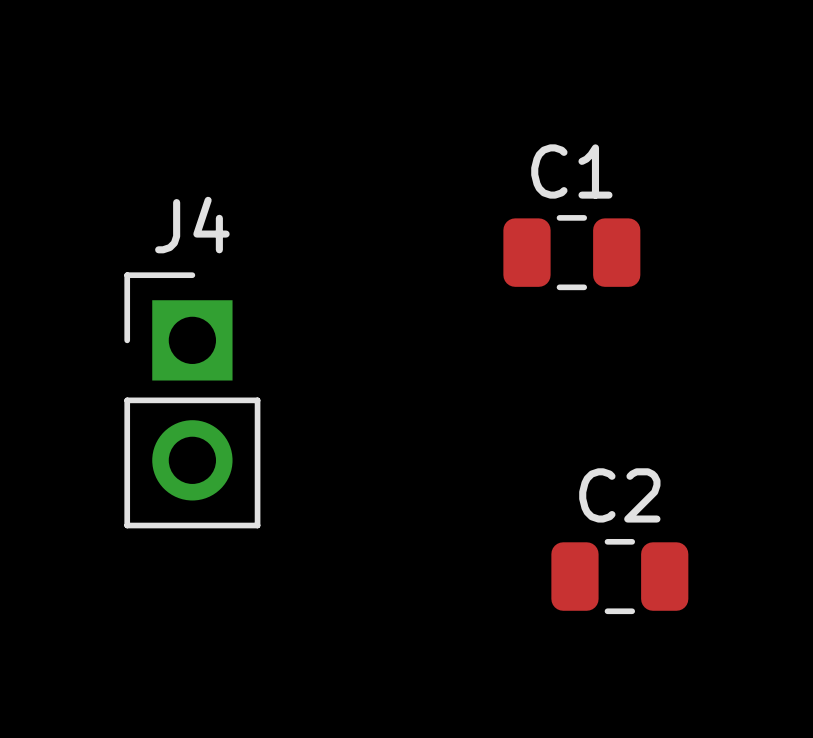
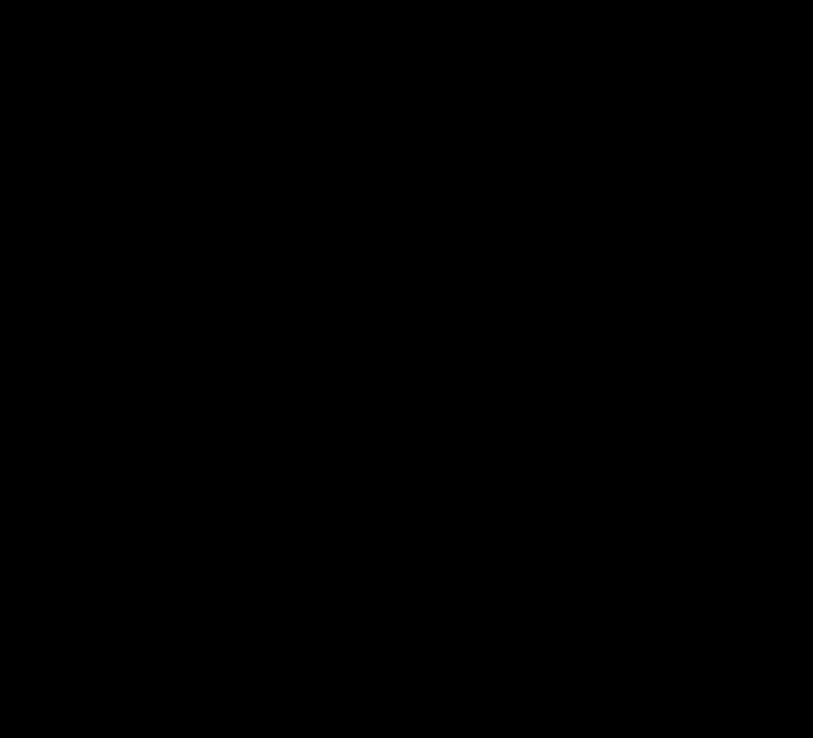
C1: (571, 252) -> none
J4: (192, 400) -> none
C2: (619, 576) -> none

